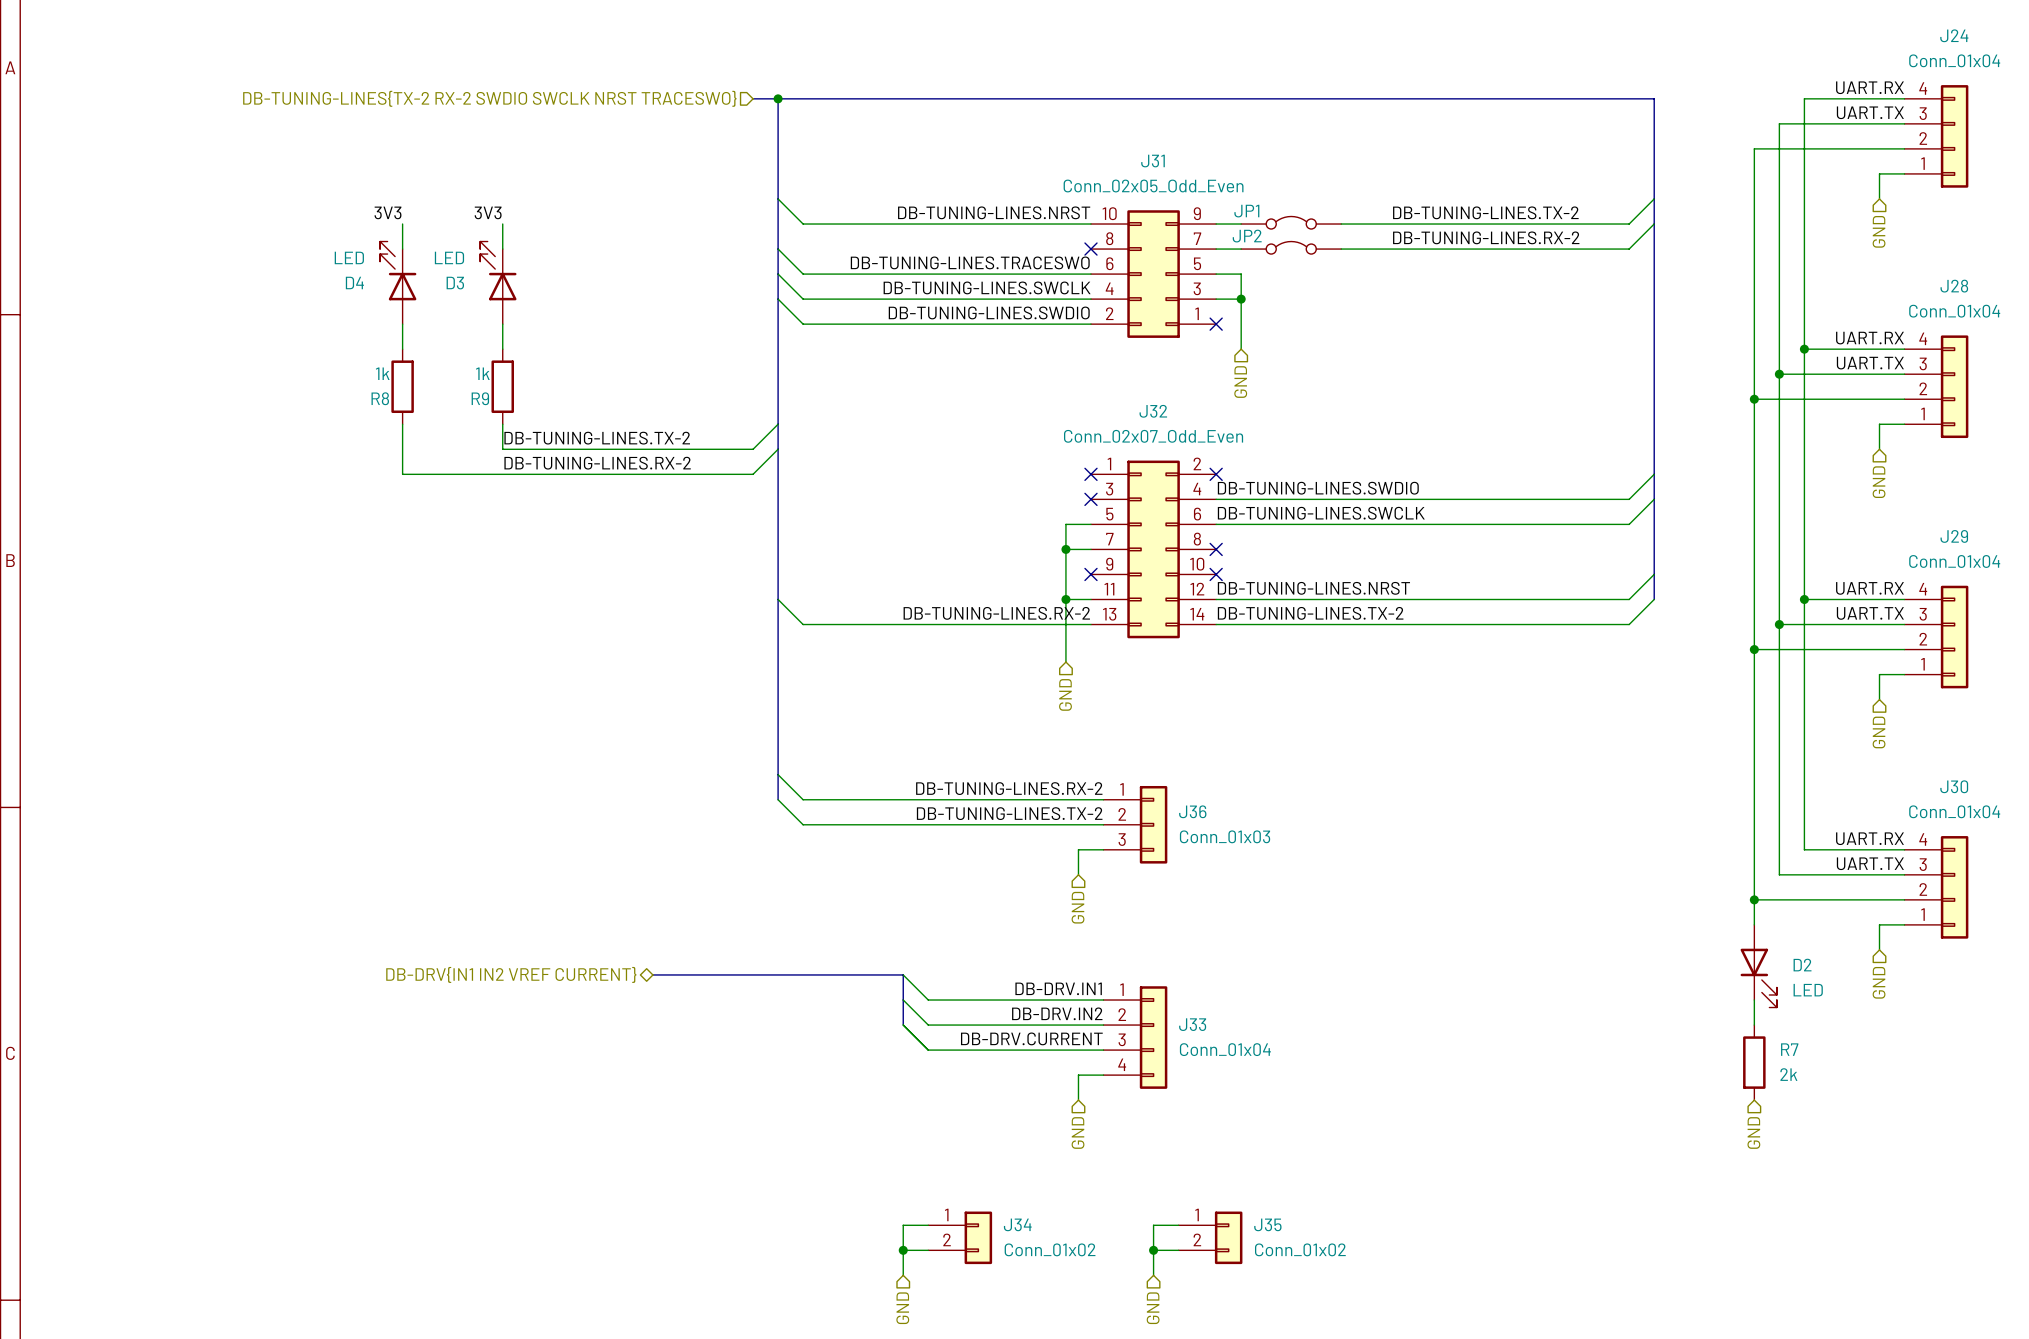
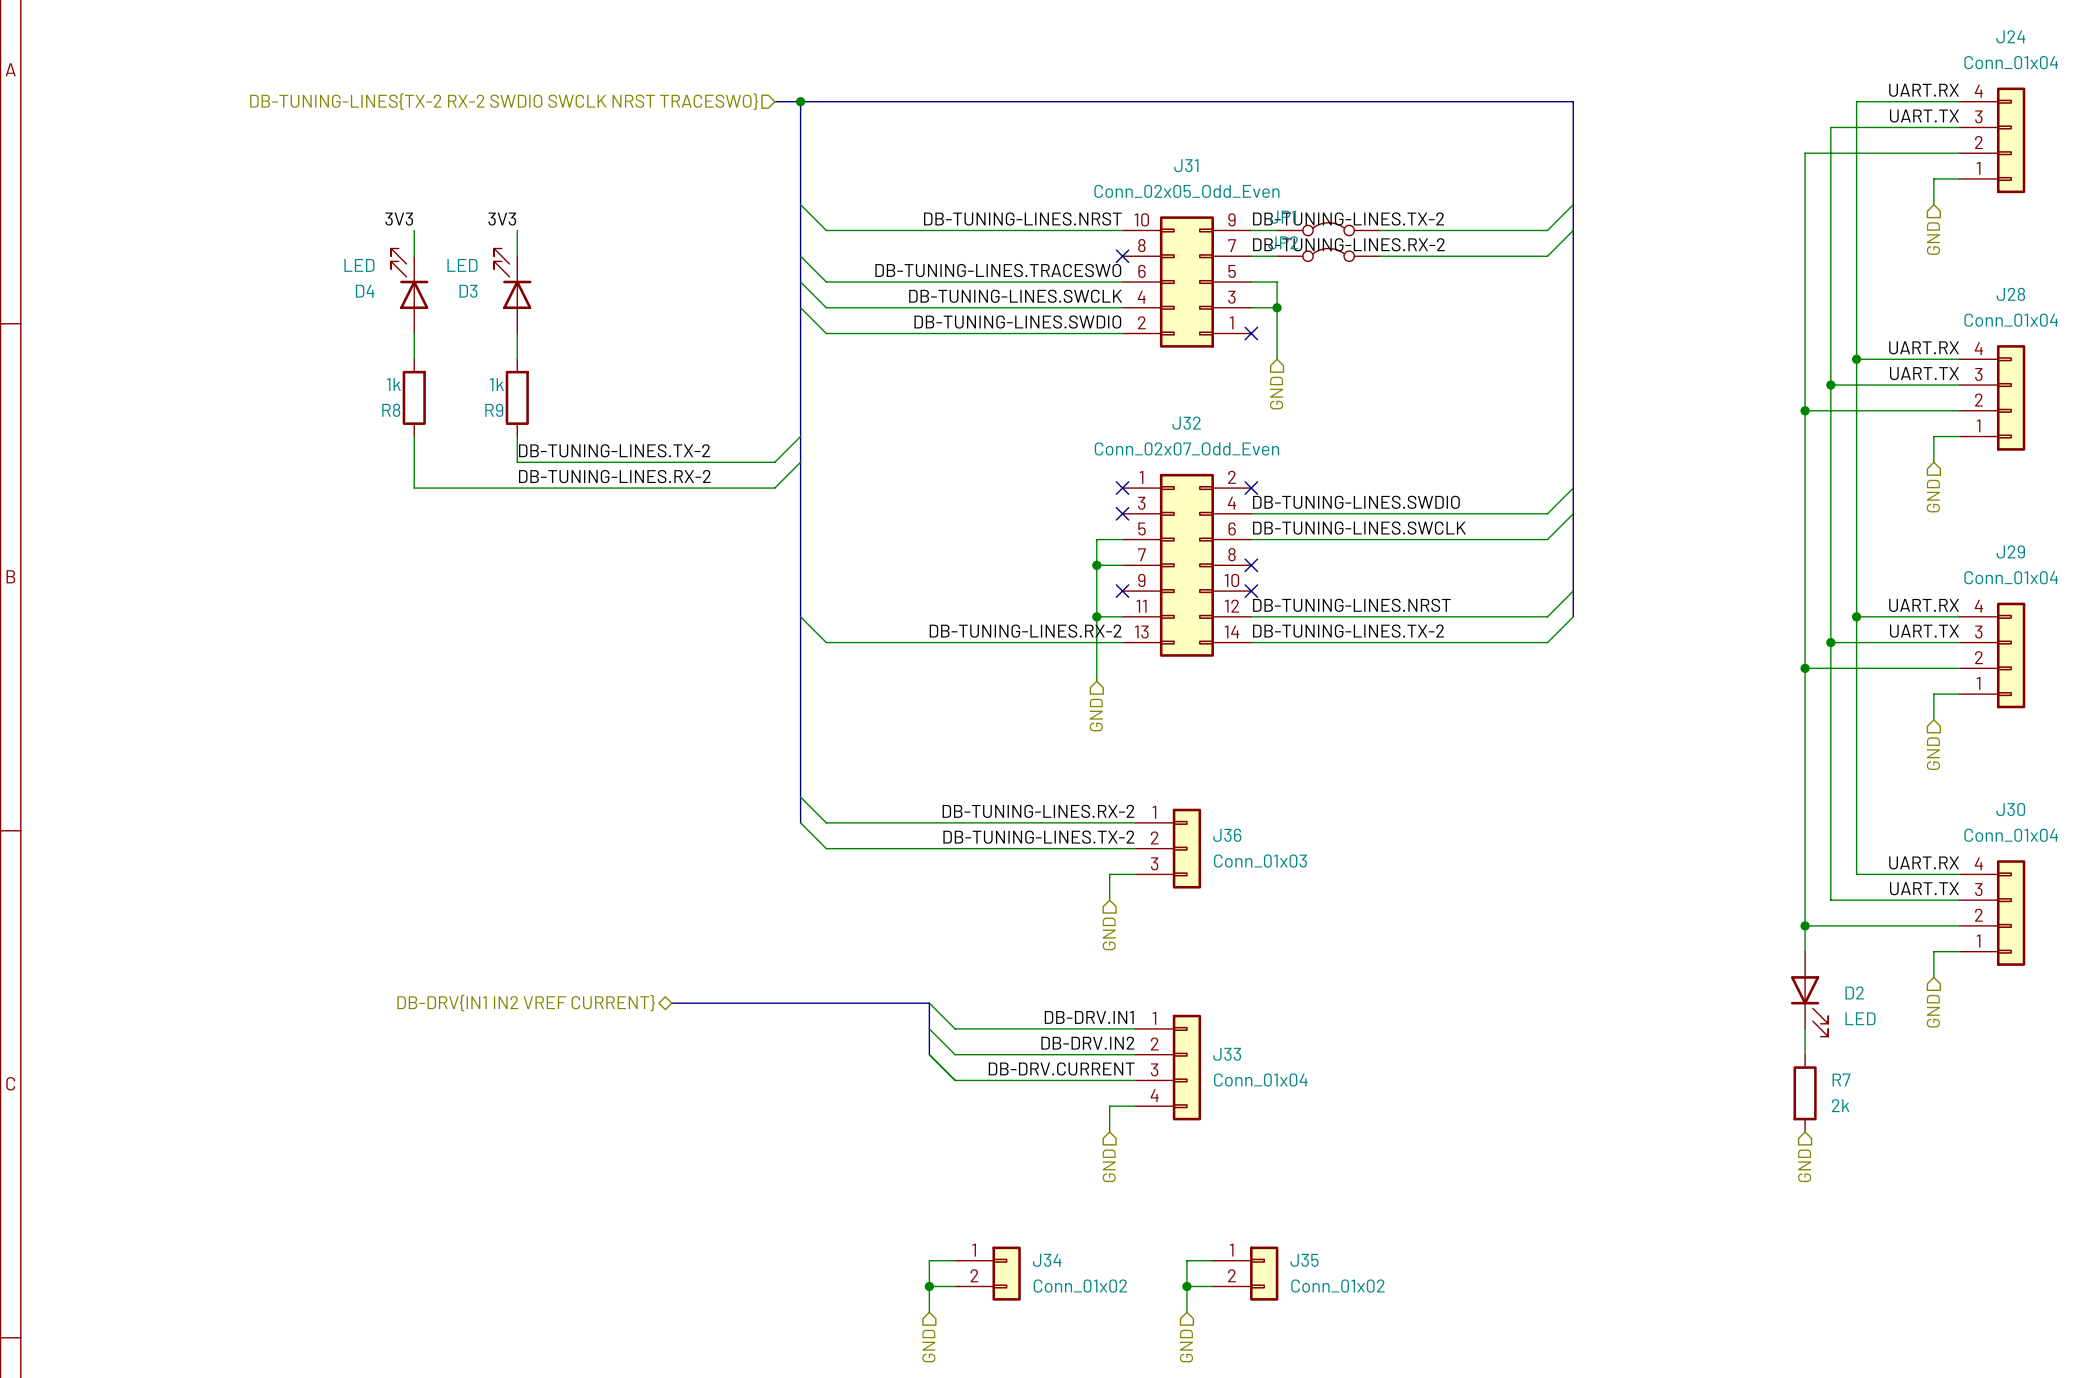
bus: (1529, 98) (1654, 98) (1654, 599) -> (1573, 101) (1573, 616)
wire: (1654, 198) (1629, 224) (1504, 224) -> (1573, 204) (1547, 230)
label position: DB-TUNING-LINES.TX-2 (1485, 212) -> DB-TUNING-LINES.TX-2 (1348, 218)
wire: (1654, 224) (1629, 249) (1504, 249) -> (1573, 230) (1547, 256)
label position: DB-TUNING-LINES.RX-2 (1486, 237) -> DB-TUNING-LINES.RX-2 (1348, 244)
wire: (1654, 474) (1629, 499) (1504, 499) -> (1573, 488) (1547, 513)
wire: (1654, 499) (1629, 524) (1504, 524) -> (1573, 513) (1547, 539)
wire: (1654, 574) (1629, 599) (1504, 599) -> (1573, 591) (1547, 616)
wire: (1654, 599) (1629, 624) (1504, 624) -> (1573, 616) (1547, 642)

